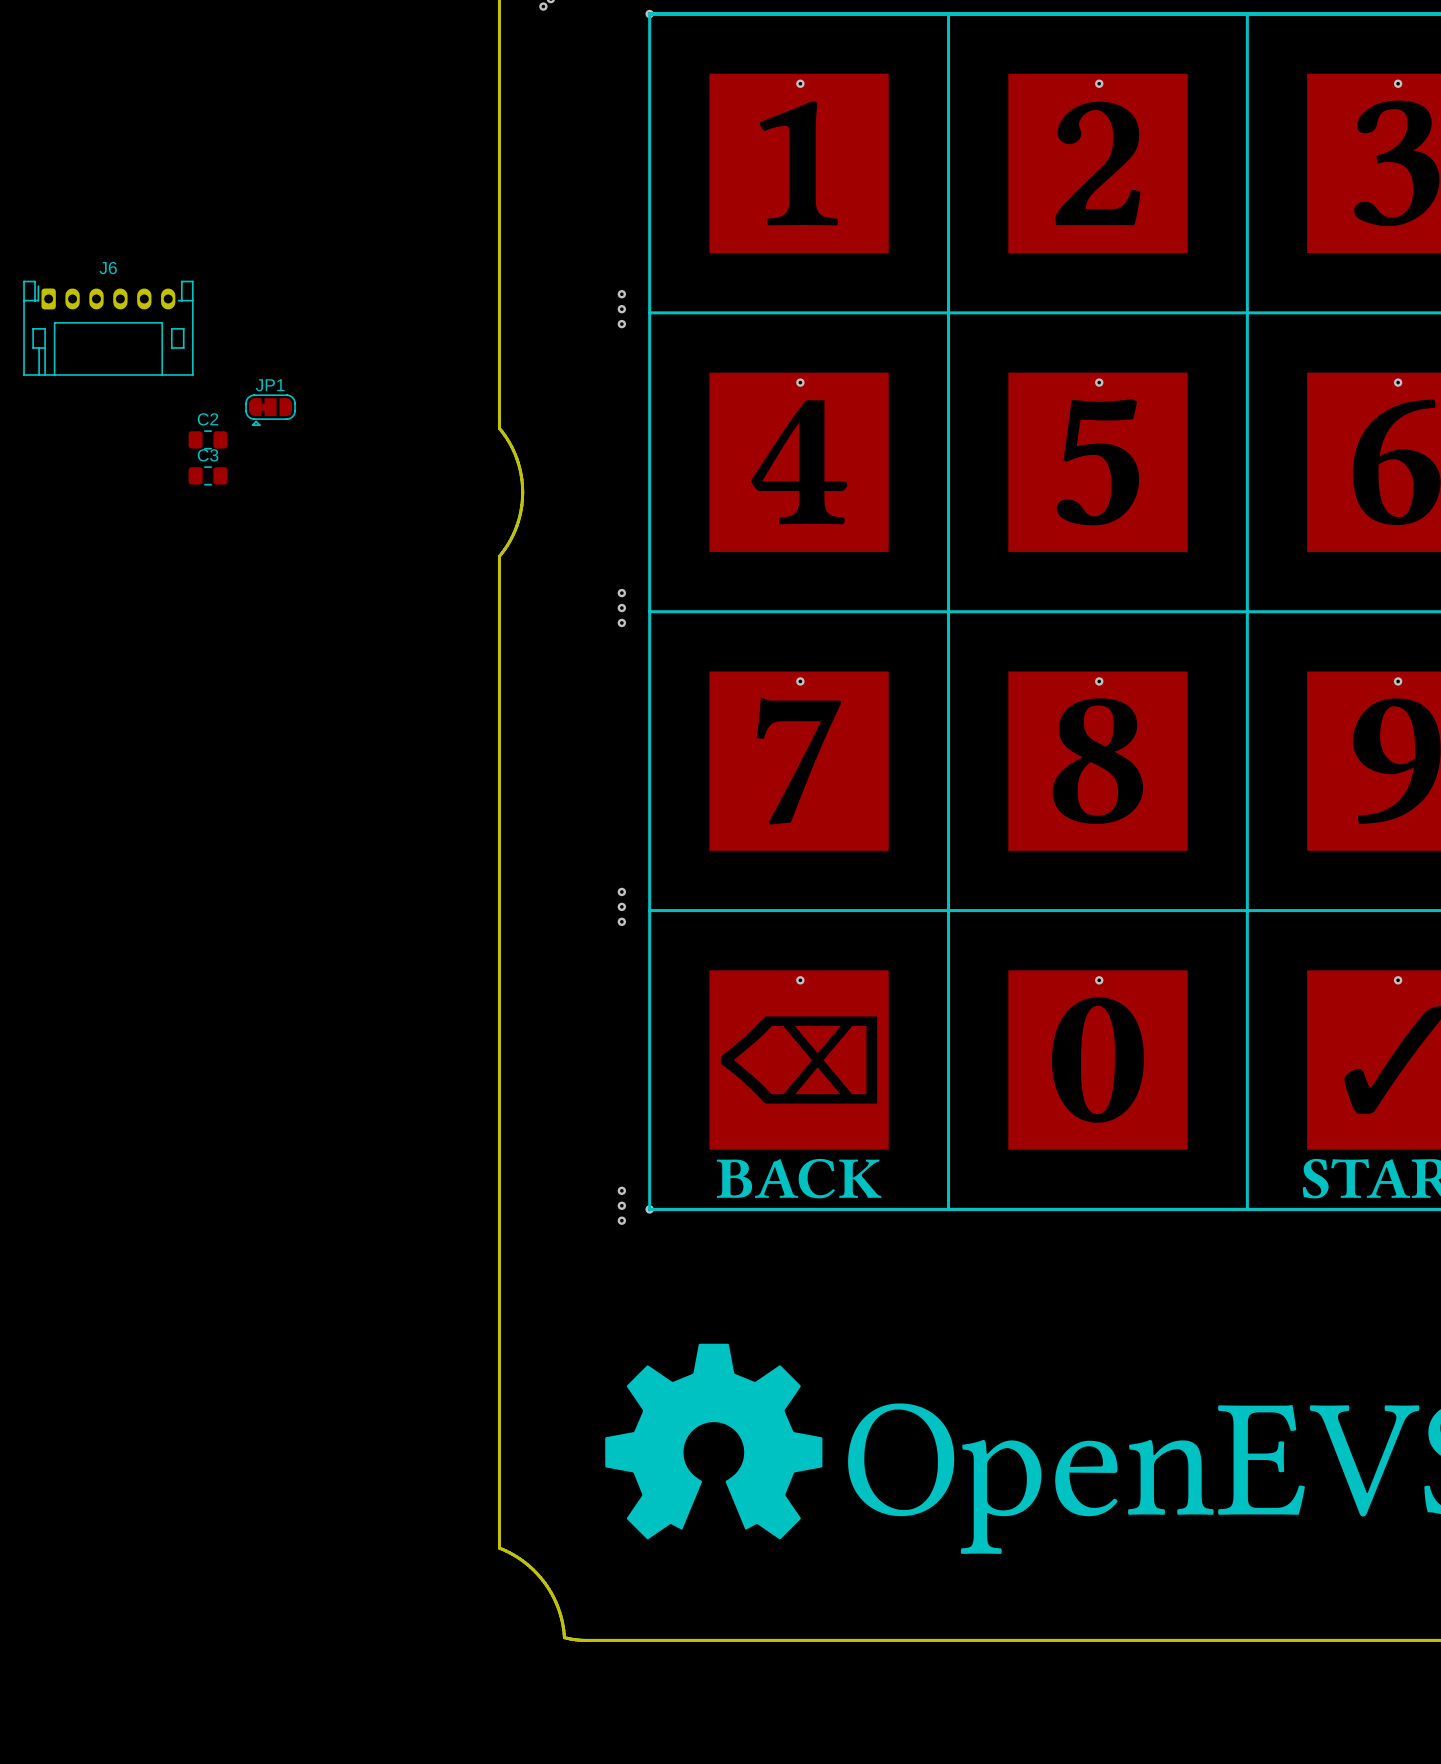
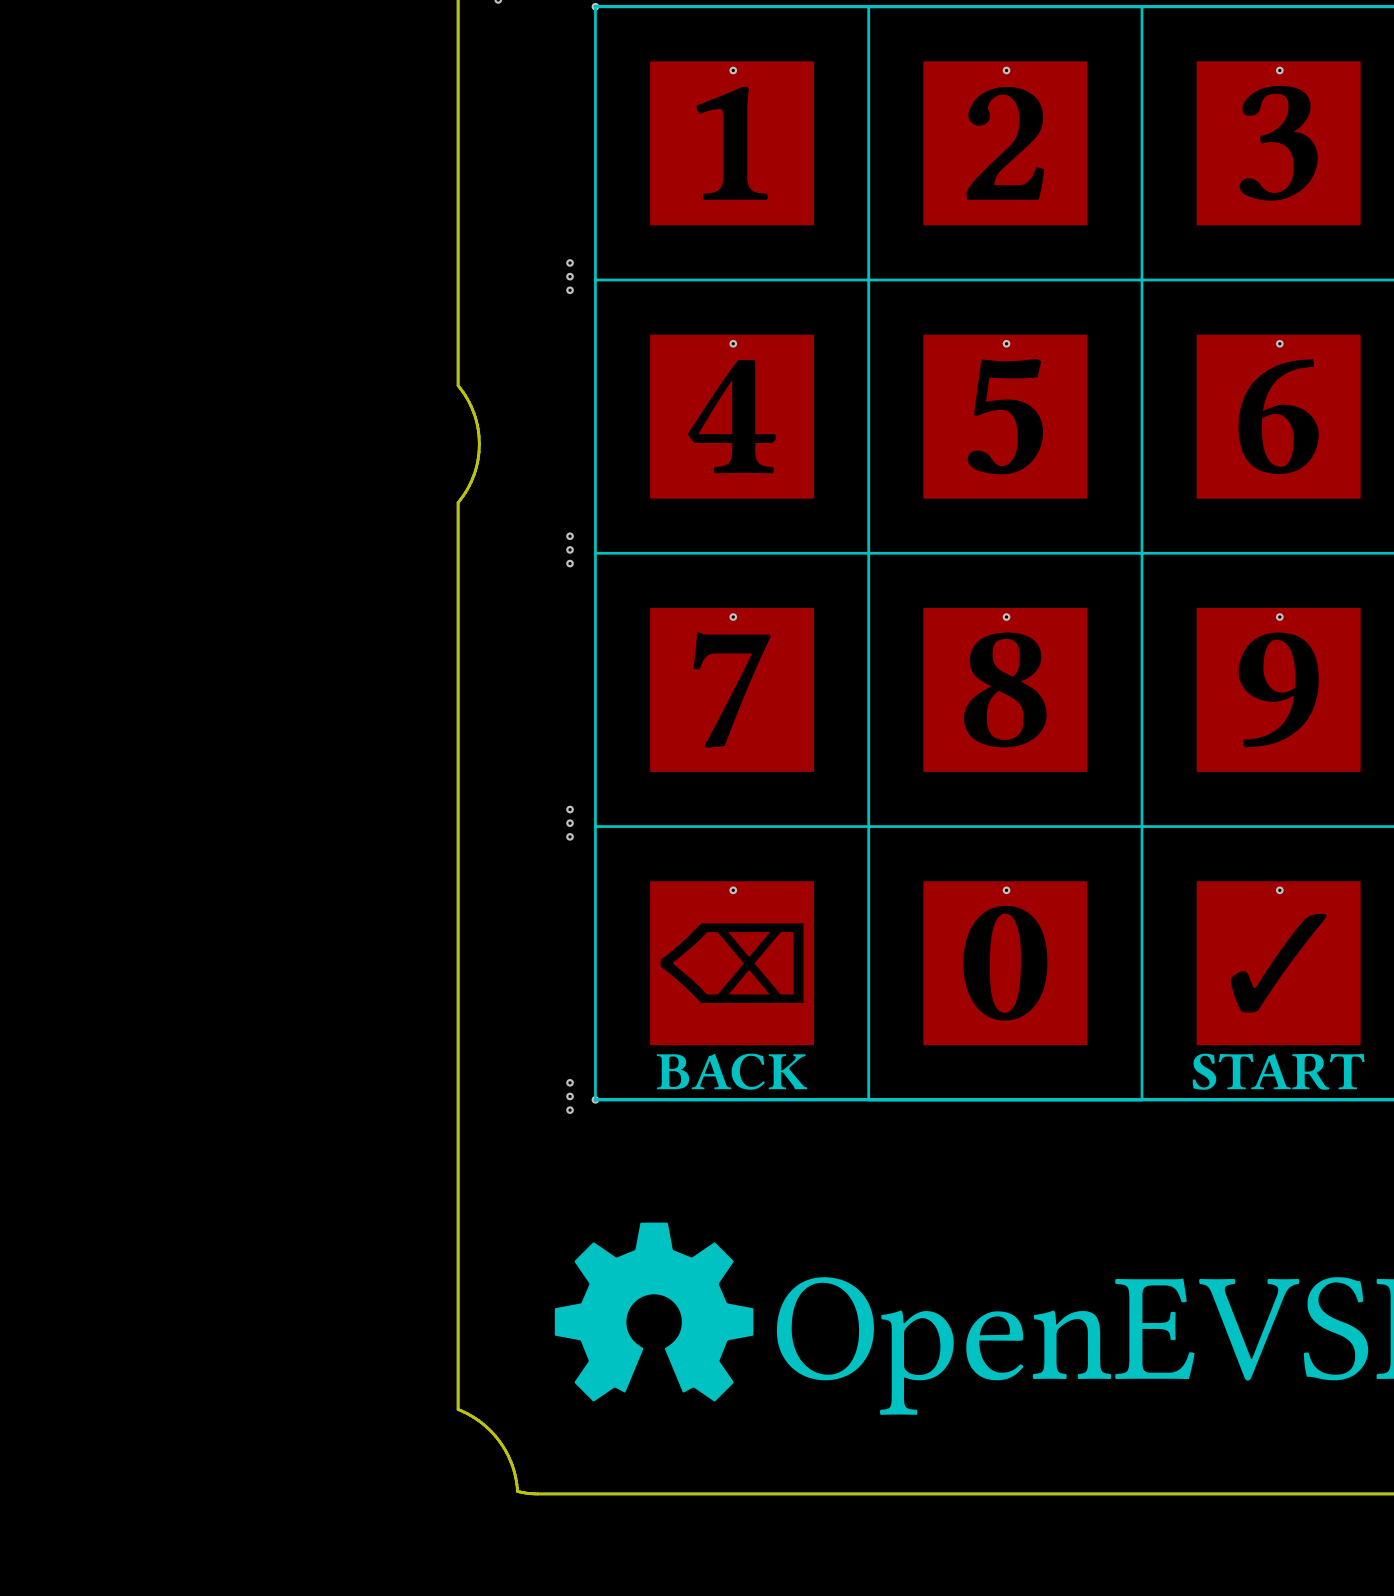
J6: (108, 328) -> none
JP1: (270, 410) -> none
C2: (208, 439) -> none
C3: (208, 475) -> none

